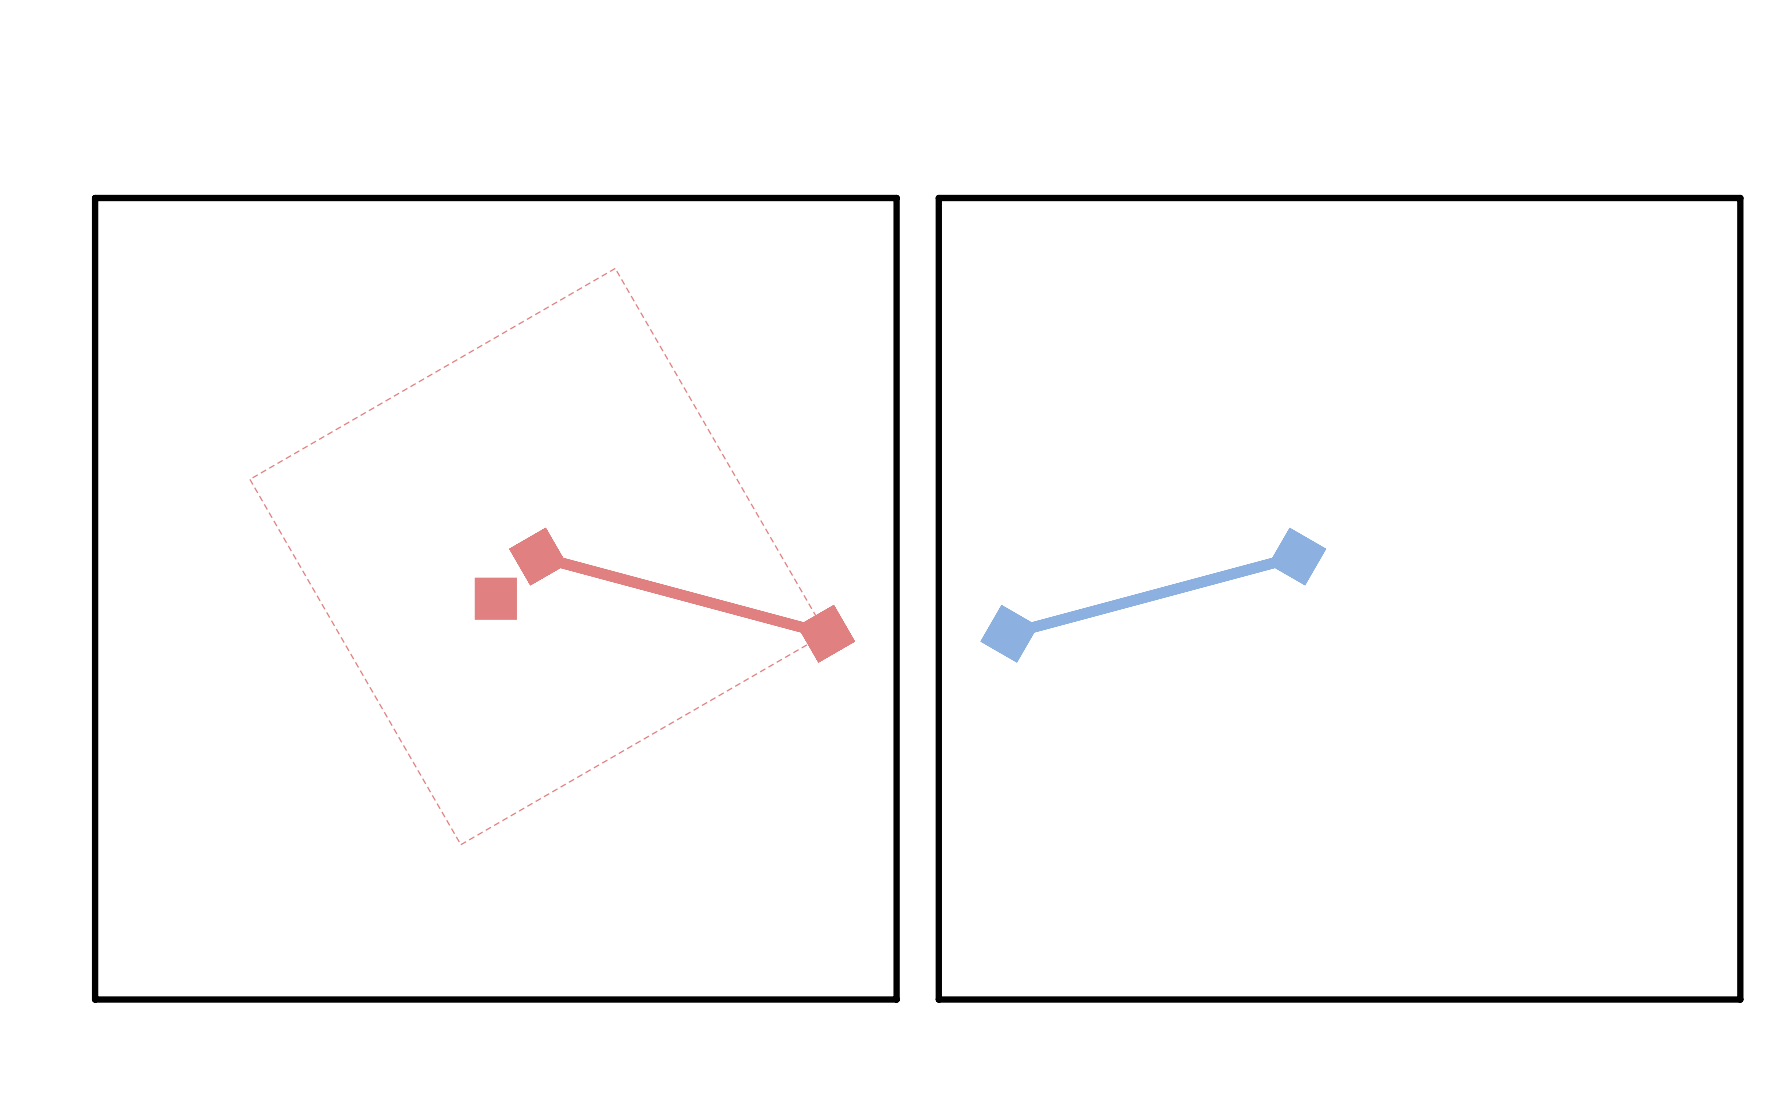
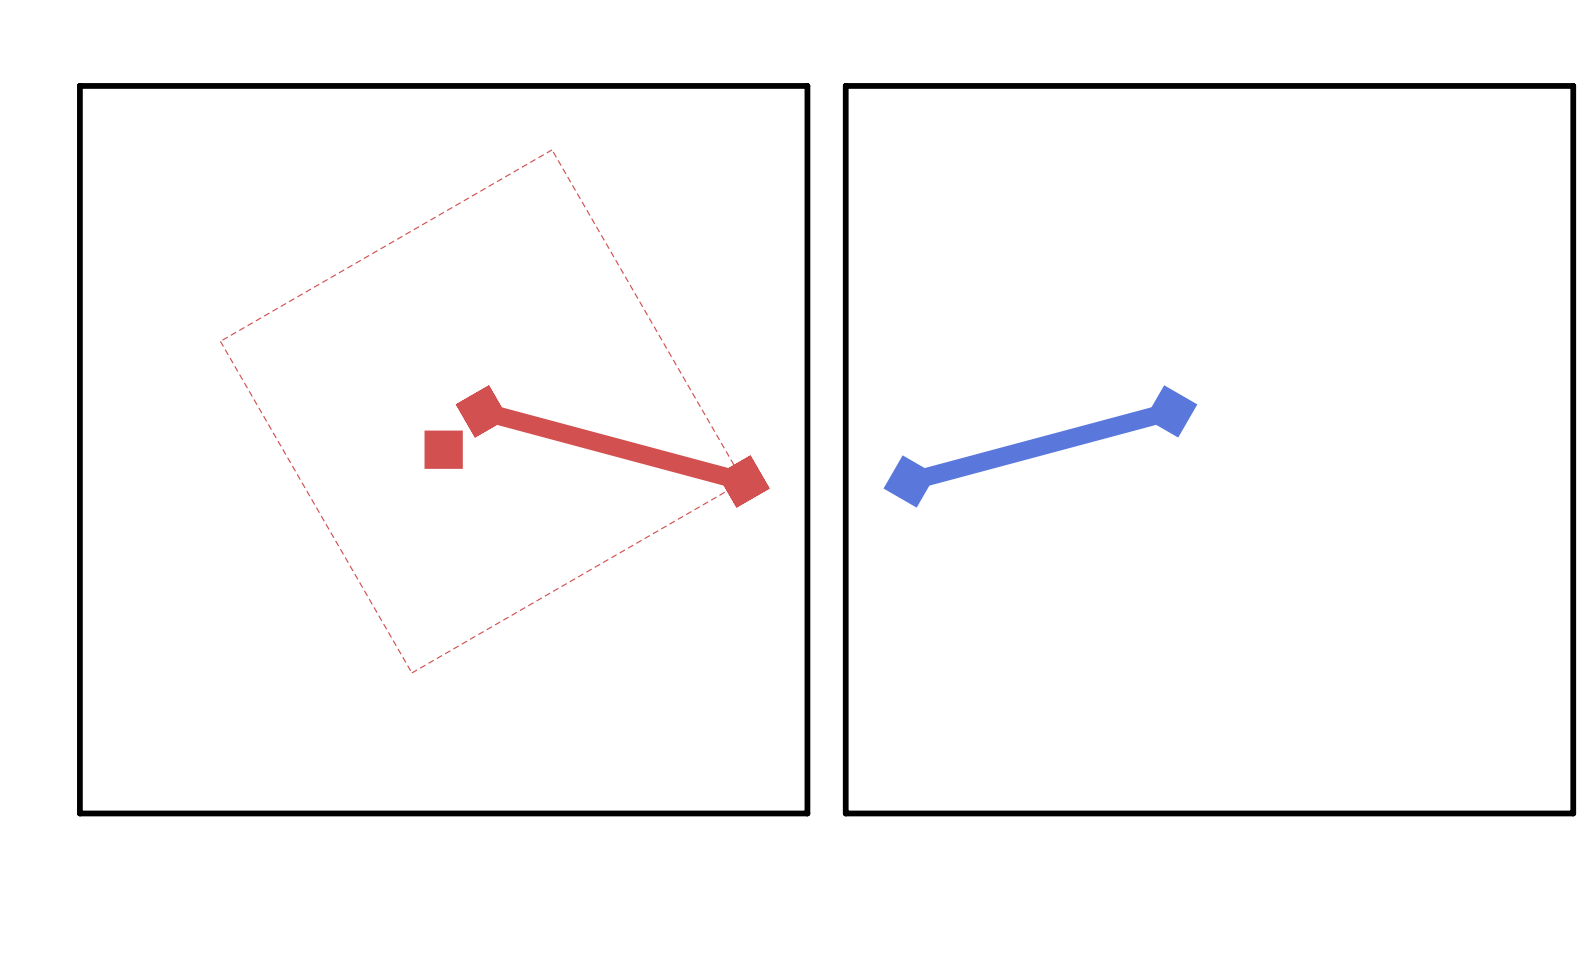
top track width: thin (538, 556) (826, 633) -> thick (481, 411) (743, 481)
bottom track width: thin (1297, 556) (1009, 633) -> thick (1171, 411) (909, 481)

